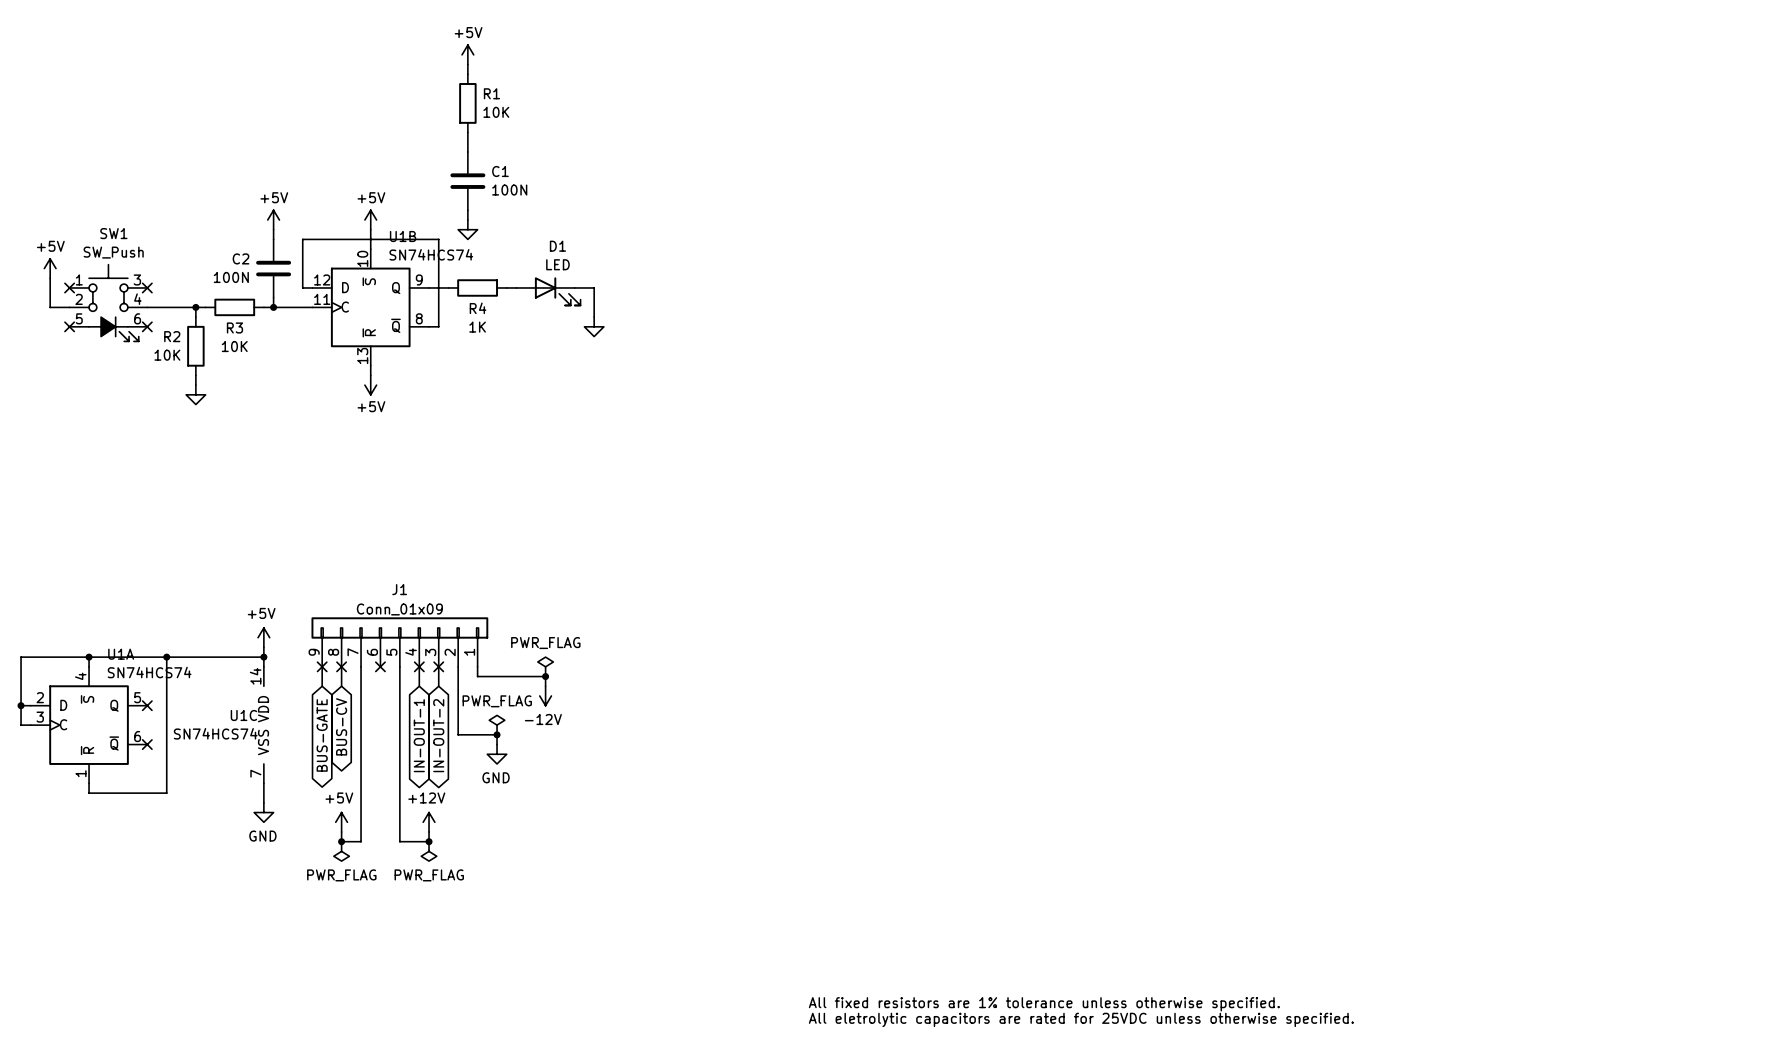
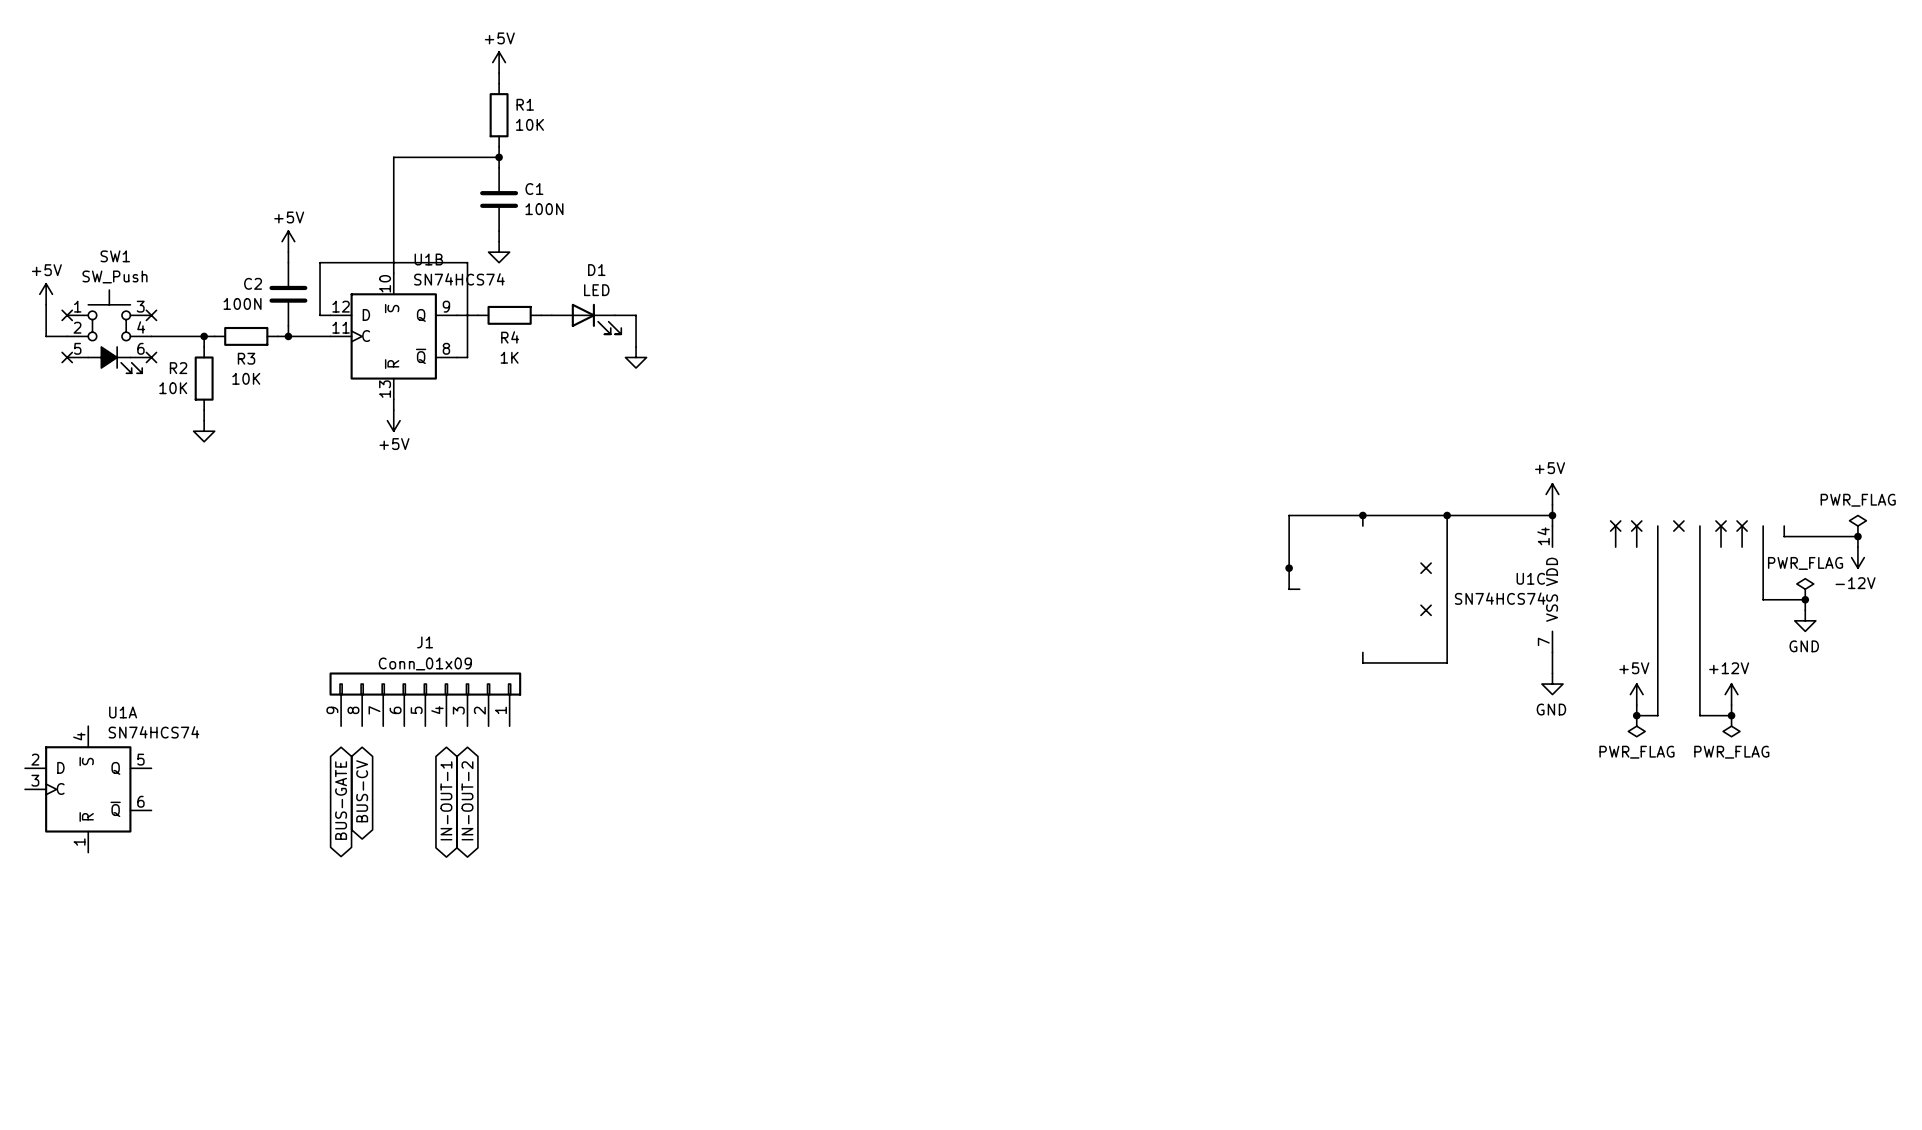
wire: none -> (499, 157) (393, 157) (393, 252)
junction: none -> (499, 157)
power symbol: +5V (370, 219) -> none
power symbol: none -> +5V (1552, 494)
wire: none -> (1552, 504) (1552, 526)
wire: none -> (1362, 515) (1362, 526)
junction: none -> (1362, 515)
wire: none -> (1447, 515) (1447, 662) (1362, 662) (1362, 652)
junction: none -> (1447, 515)
wire: none -> (1552, 515) (1289, 515) (1289, 589) (1299, 589)
junction: none -> (1552, 515)
wire: none -> (1615, 526) (1615, 547)
no-connect mark: none -> (1615, 526)
wire: none -> (1636, 526) (1636, 547)
no-connect mark: none -> (1636, 526)
wire: none -> (1657, 526) (1657, 715) (1636, 715) (1636, 705)
no-connect mark: none -> (1678, 526)
wire: none -> (1699, 526) (1699, 715) (1731, 715) (1731, 705)
wire: none -> (1721, 526) (1721, 547)
no-connect mark: none -> (1721, 526)
wire: none -> (1742, 526) (1742, 547)
no-connect mark: none -> (1742, 526)
wire: none -> (1763, 526) (1763, 599) (1805, 599) (1805, 610)
wire: none -> (1784, 526) (1784, 536) (1857, 536) (1857, 547)
power symbol: none -> PWR_FLAG (1857, 526)
junction: none -> (1857, 536)
power symbol: none -> -12V (1857, 557)
junction: none -> (1289, 568)
no-connect mark: none -> (1426, 568)
power symbol: none -> PWR_FLAG (1805, 589)
junction: none -> (1805, 599)
no-connect mark: none -> (1426, 610)
power symbol: none -> GND (1805, 620)
wire: none -> (1552, 652) (1552, 673)
power symbol: none -> GND (1552, 684)
power symbol: +5V (263, 637) -> none
power symbol: none -> +5V (1636, 694)
power symbol: none -> +12V (1731, 694)
wire: (263, 647) (263, 666) -> none
wire: (89, 657) (89, 666) -> none
junction: (89, 657) -> none
wire: (166, 657) (166, 793) (89, 793) (89, 783) -> none
junction: (166, 657) -> none
wire: (263, 657) (21, 657) (21, 725) (30, 725) -> none
junction: (263, 657) -> none
junction: none -> (1636, 715)
junction: none -> (1731, 715)
wire: (322, 666) (322, 686) -> none
no-connect mark: (322, 666) -> none
wire: (341, 666) (341, 686) -> none
no-connect mark: (341, 666) -> none
wire: (361, 666) (361, 841) (341, 841) (341, 831) -> none
no-connect mark: (380, 666) -> none
wire: (399, 666) (399, 841) (429, 841) (429, 831) -> none
wire: (419, 666) (419, 686) -> none
no-connect mark: (419, 666) -> none
wire: (438, 666) (438, 686) -> none
no-connect mark: (438, 666) -> none
wire: (458, 666) (458, 734) (497, 734) (497, 744) -> none
wire: (477, 666) (477, 676) (545, 676) (545, 686) -> none
power symbol: PWR_FLAG (545, 666) -> none
power symbol: none -> PWR_FLAG (1636, 726)
power symbol: none -> PWR_FLAG (1731, 726)
junction: (545, 676) -> none
power symbol: -12V (545, 695) -> none
wire: (21, 705) (30, 705) -> none
junction: (21, 705) -> none
no-connect mark: (147, 705) -> none
U1C position: (263, 725) -> (1552, 589)
power symbol: PWR_FLAG (497, 725) -> none
junction: (497, 734) -> none
no-connect mark: (147, 744) -> none
power symbol: GND (497, 754) -> none
wire: (263, 783) (263, 802) -> none
power symbol: GND (263, 812) -> none
power symbol: +5V (341, 822) -> none
power symbol: +12V (429, 822) -> none
junction: (341, 841) -> none
junction: (429, 841) -> none
power symbol: PWR_FLAG (341, 851) -> none
power symbol: PWR_FLAG (429, 851) -> none
text: All fixed resistors are 1% tolerance unless otherwise specified. (1044, 1004) -> none
text: All eletrolytic capacitors are rated for 25VDC unless otherwise specified. (1081, 1019) -> none

